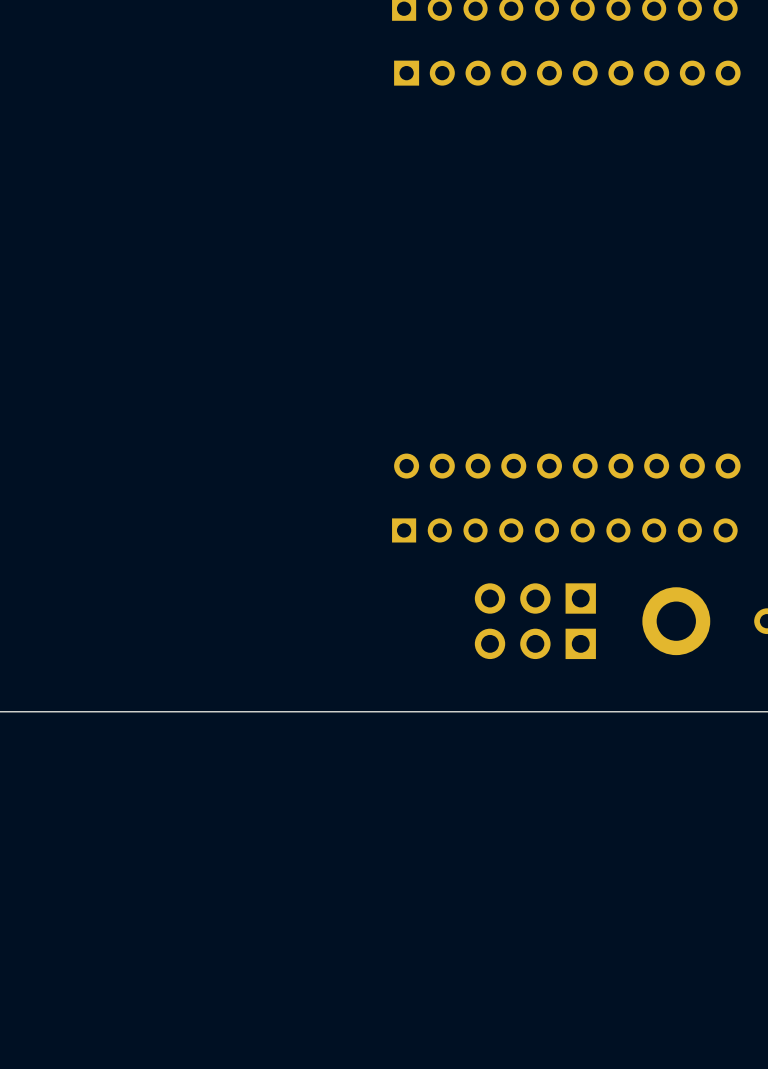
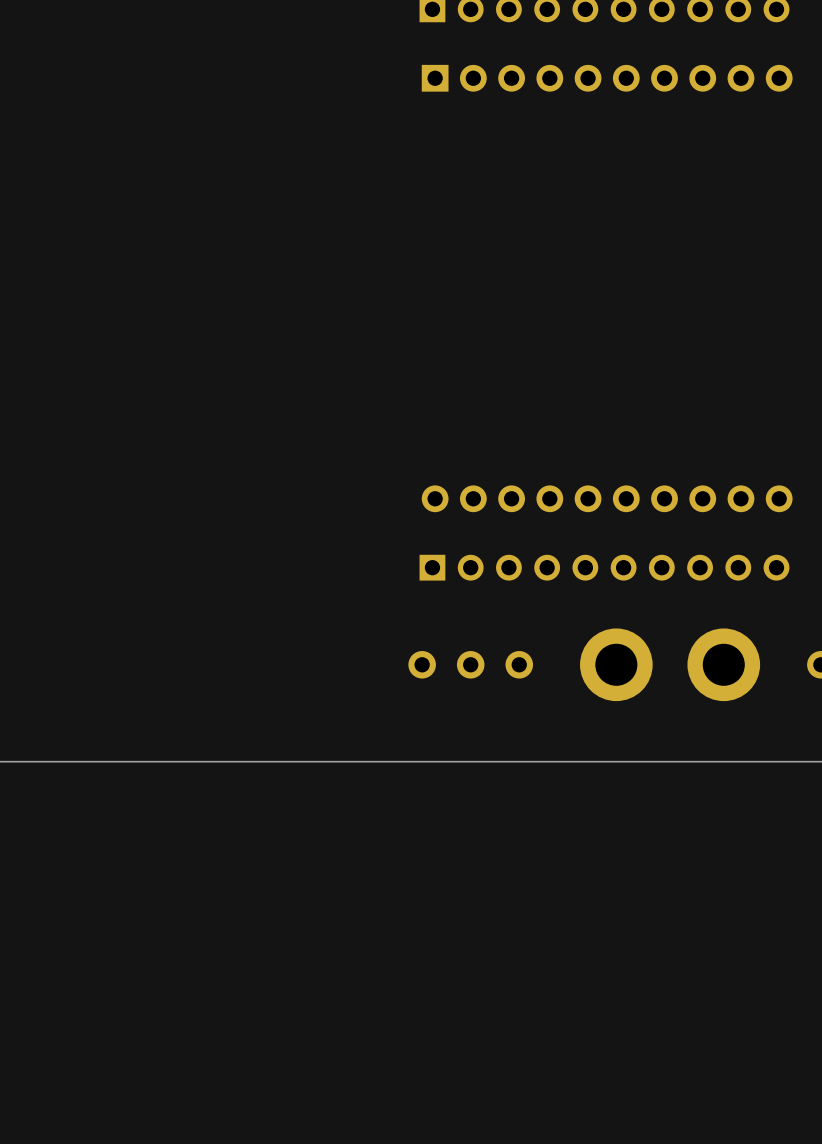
part: (535, 598) -> none
part: none -> (470, 664)
part: none -> (616, 664)
part: (535, 643) -> none

